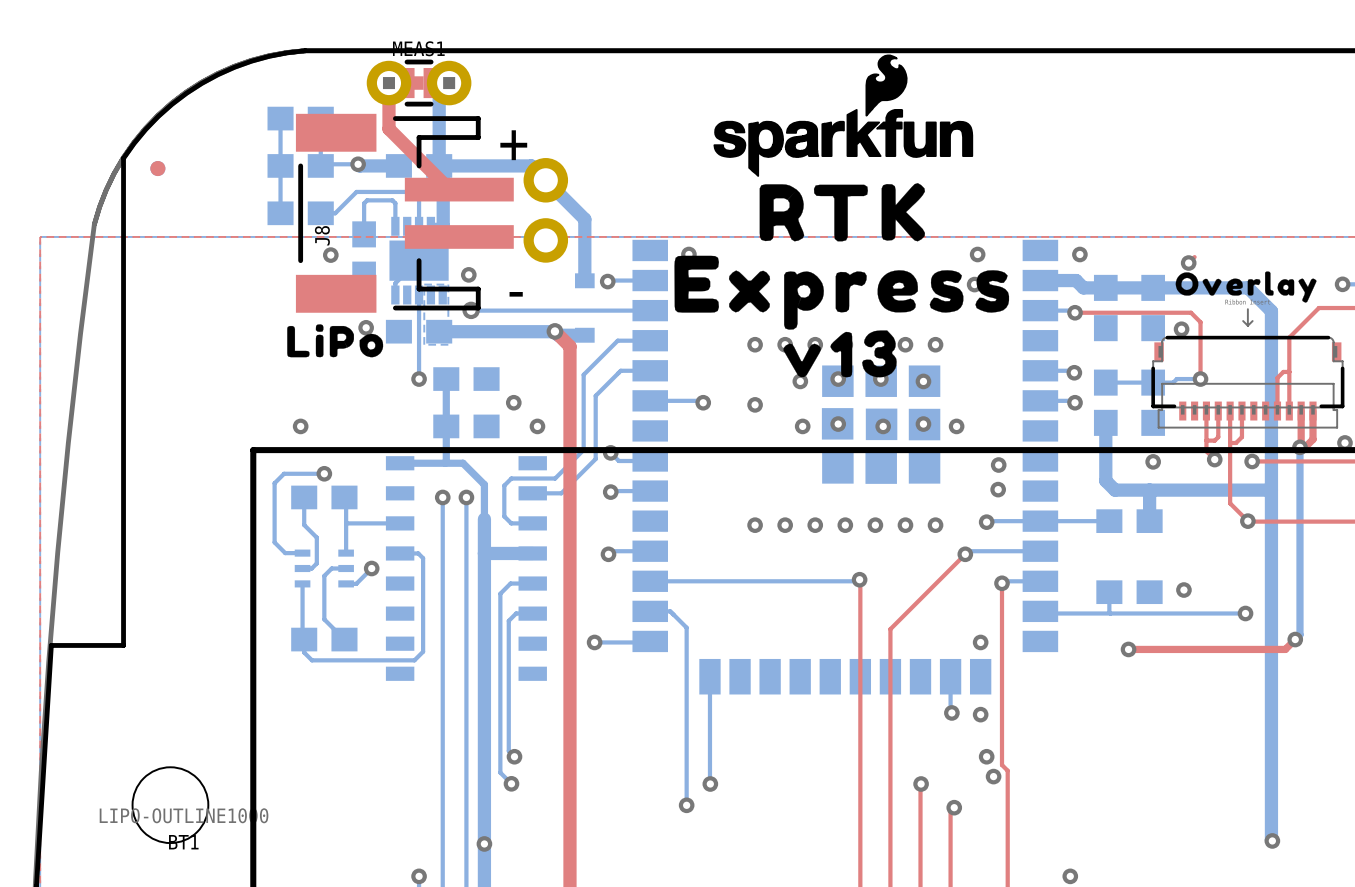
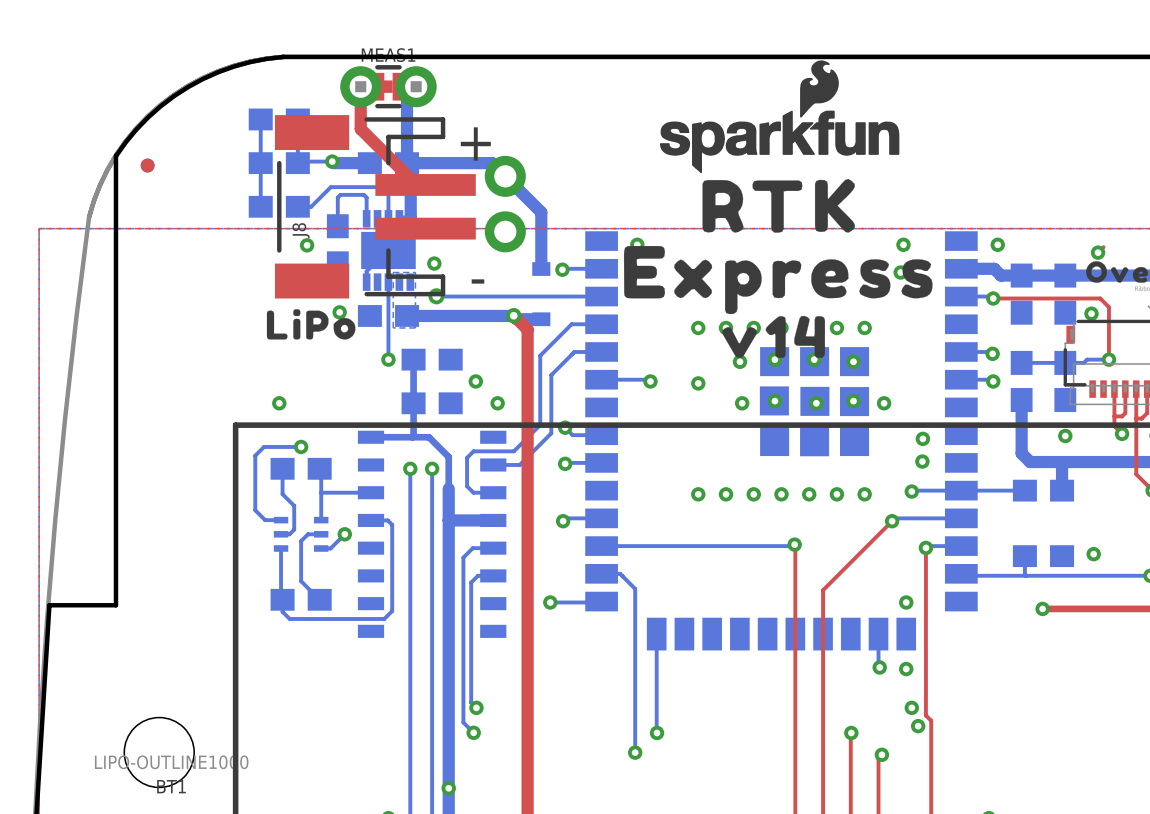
drawing shape: [783, 330, 897, 378] -> [722, 315, 825, 359]

